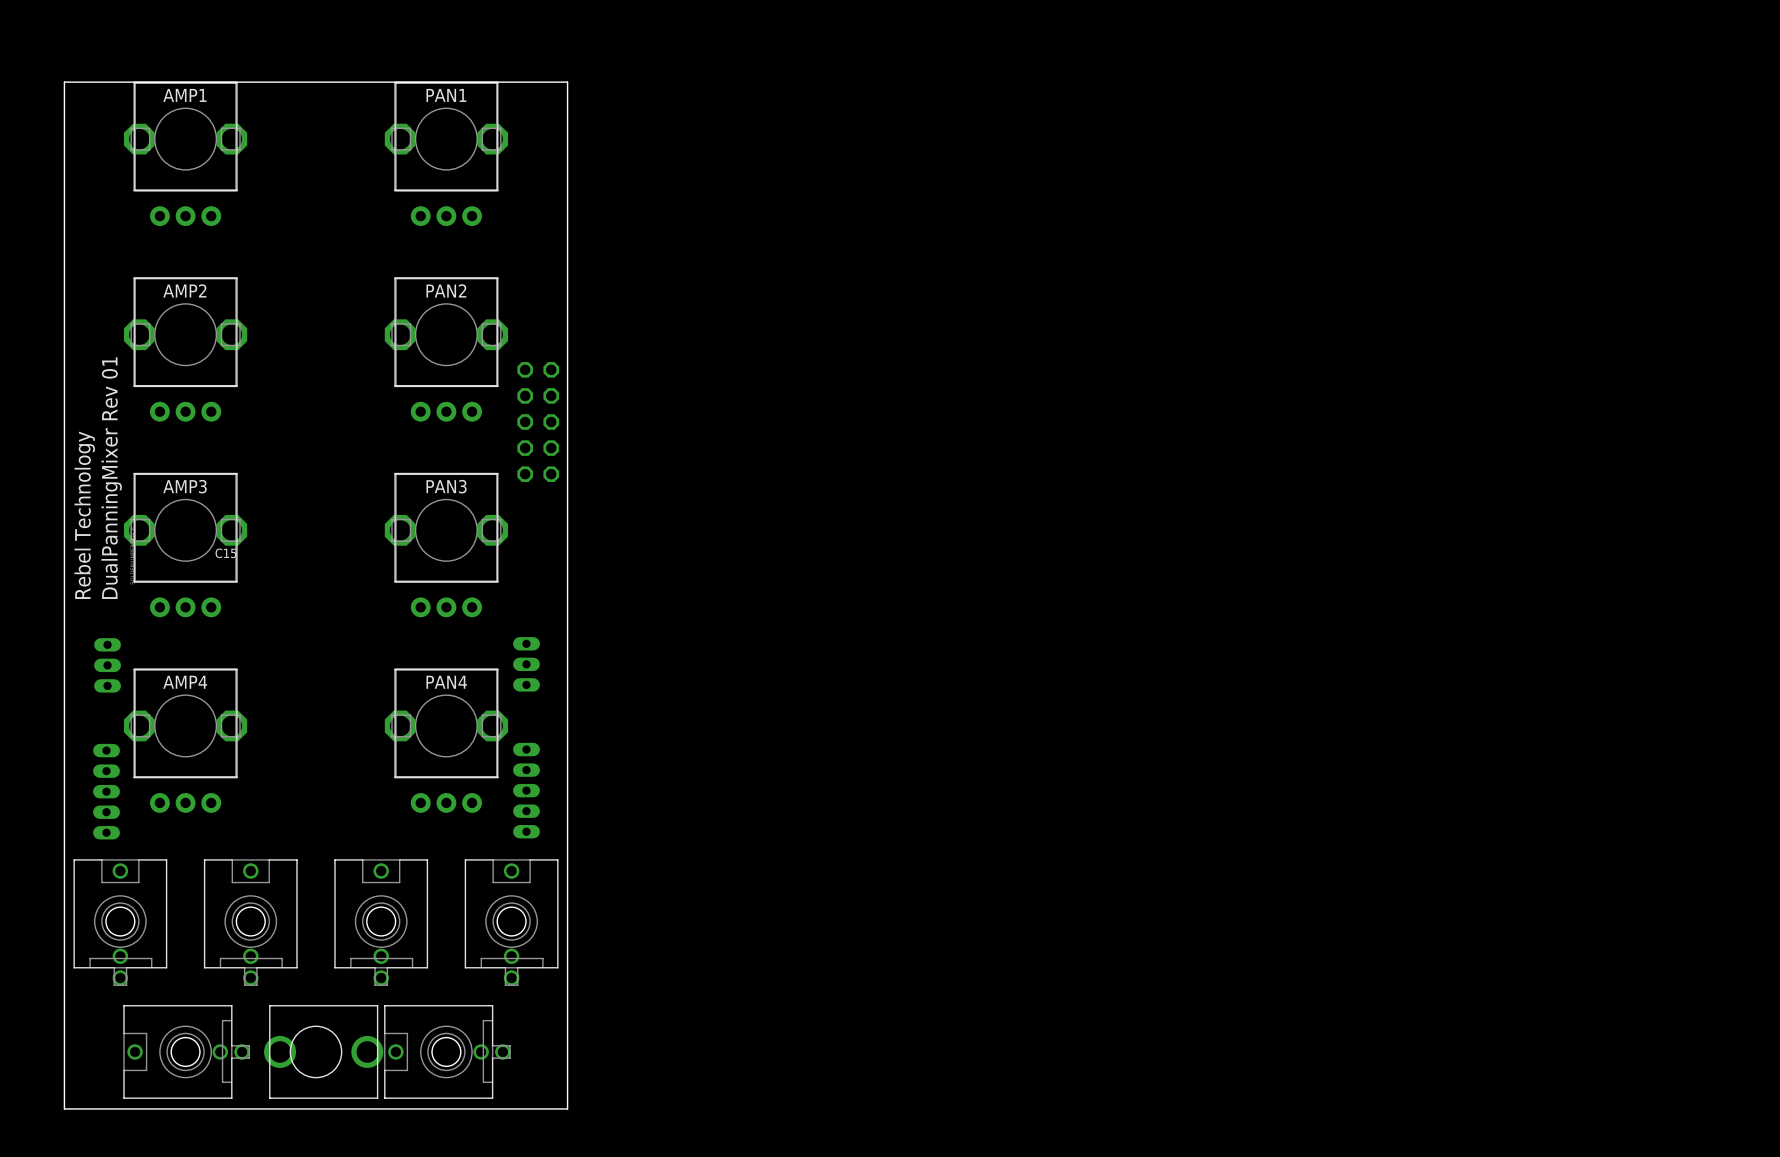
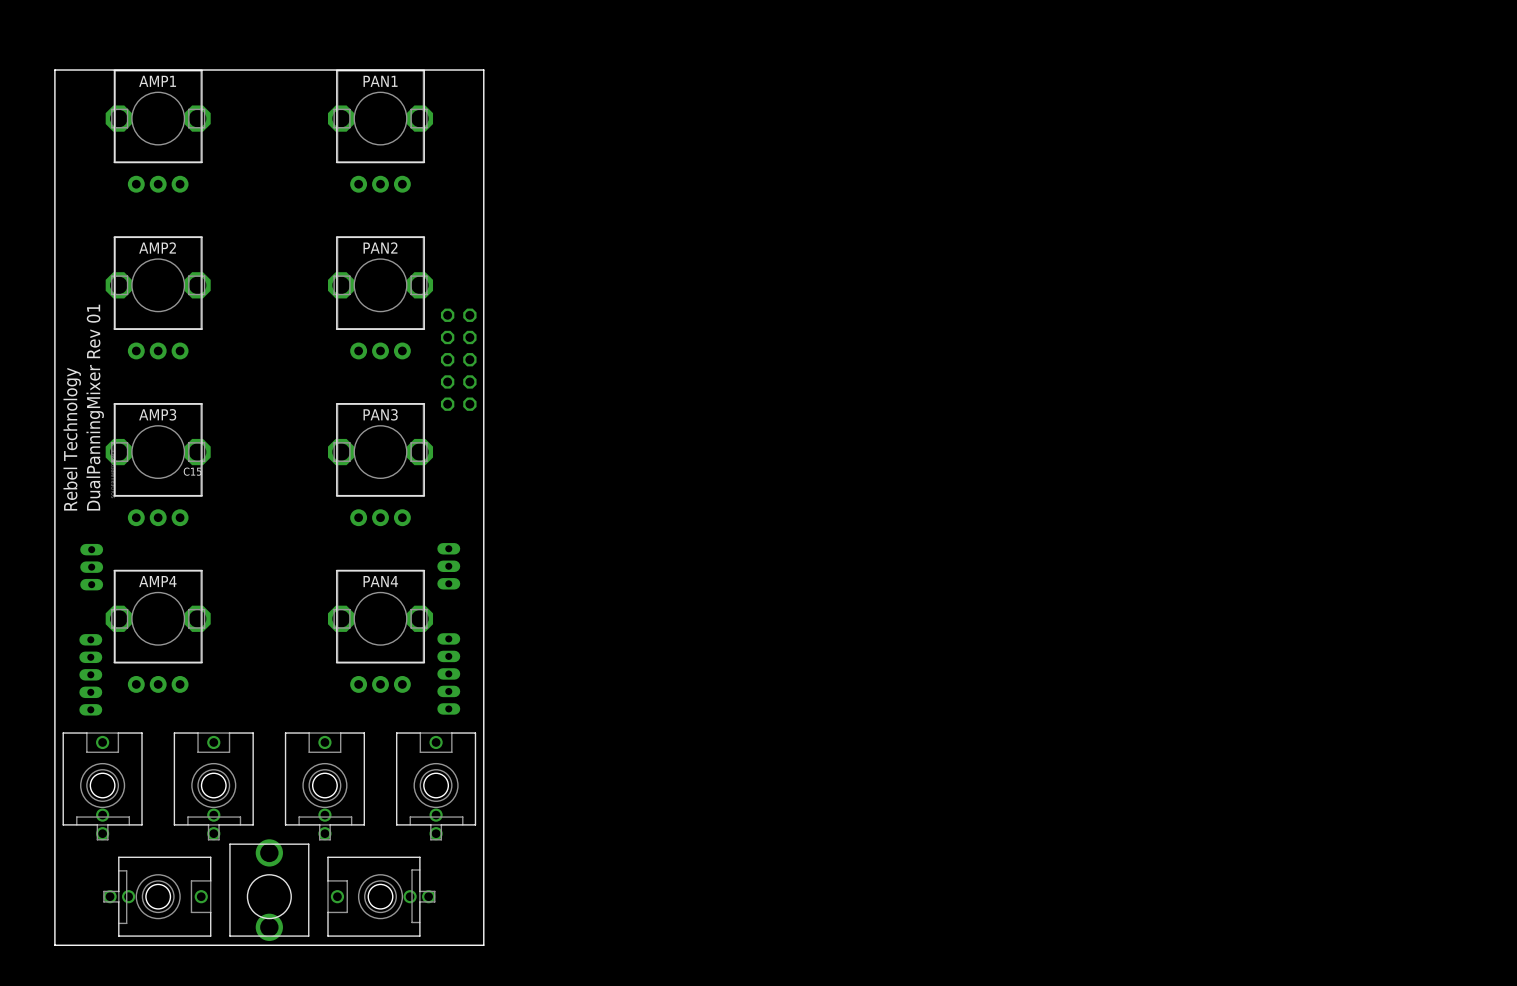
part rotation: 0° (186, 1051) -> 180° (157, 896)
part rotation: 0° (323, 1051) -> 90° counterclockwise (269, 890)

